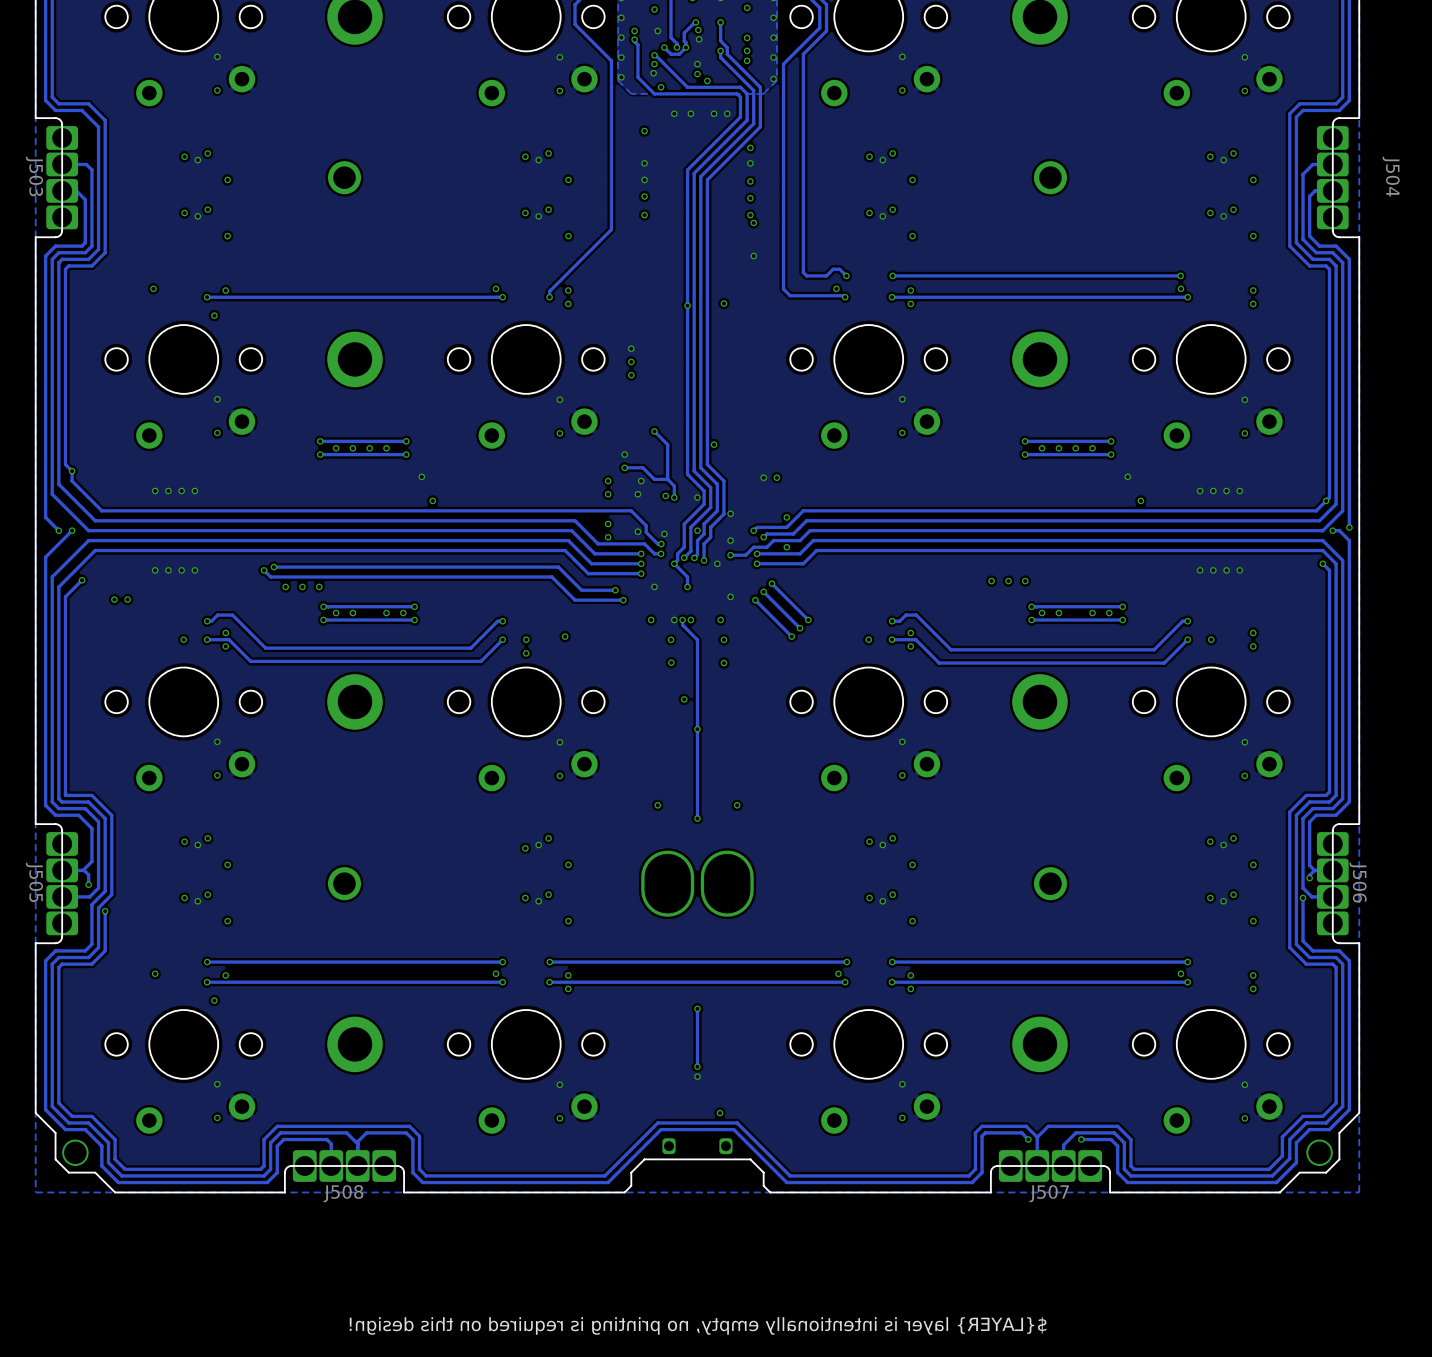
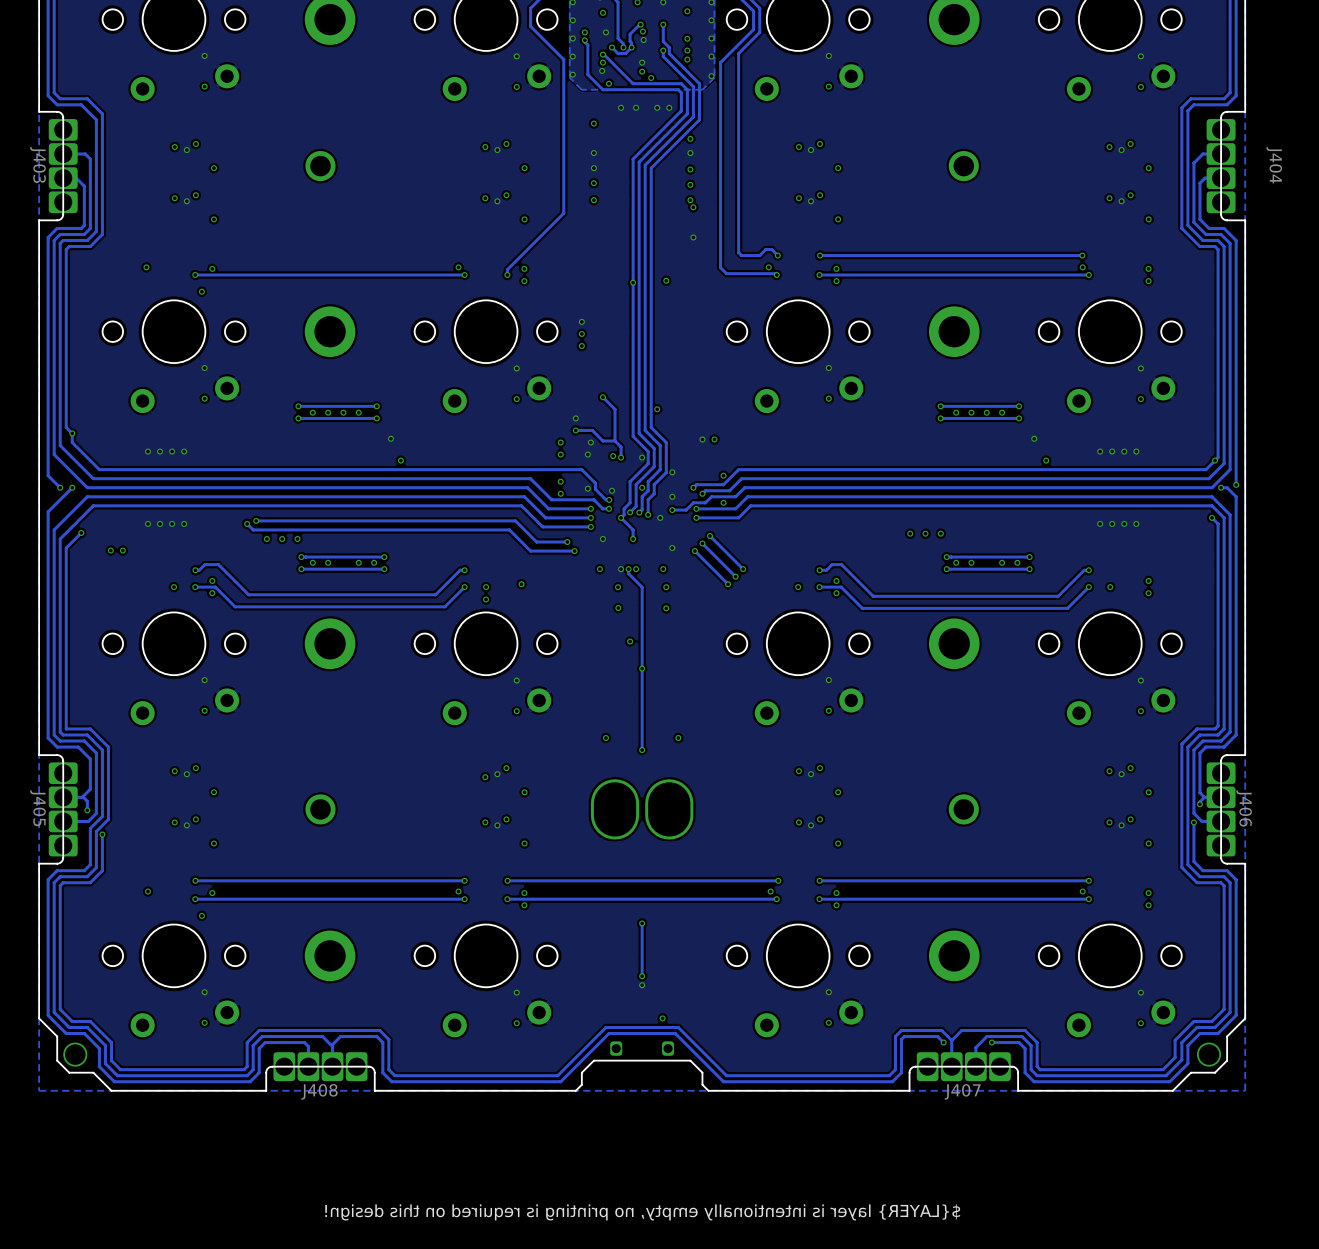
J503 name: J503 (34, 176) -> J403 (38, 164)
J504 name: J504 (1391, 176) -> J404 (1274, 165)
J505 name: J505 (34, 882) -> J405 (38, 808)
J506 name: J506 (1358, 882) -> J406 (1244, 808)
J508 name: J508 (343, 1193) -> J408 (319, 1091)
J507 name: J507 (1049, 1193) -> J407 (962, 1091)

